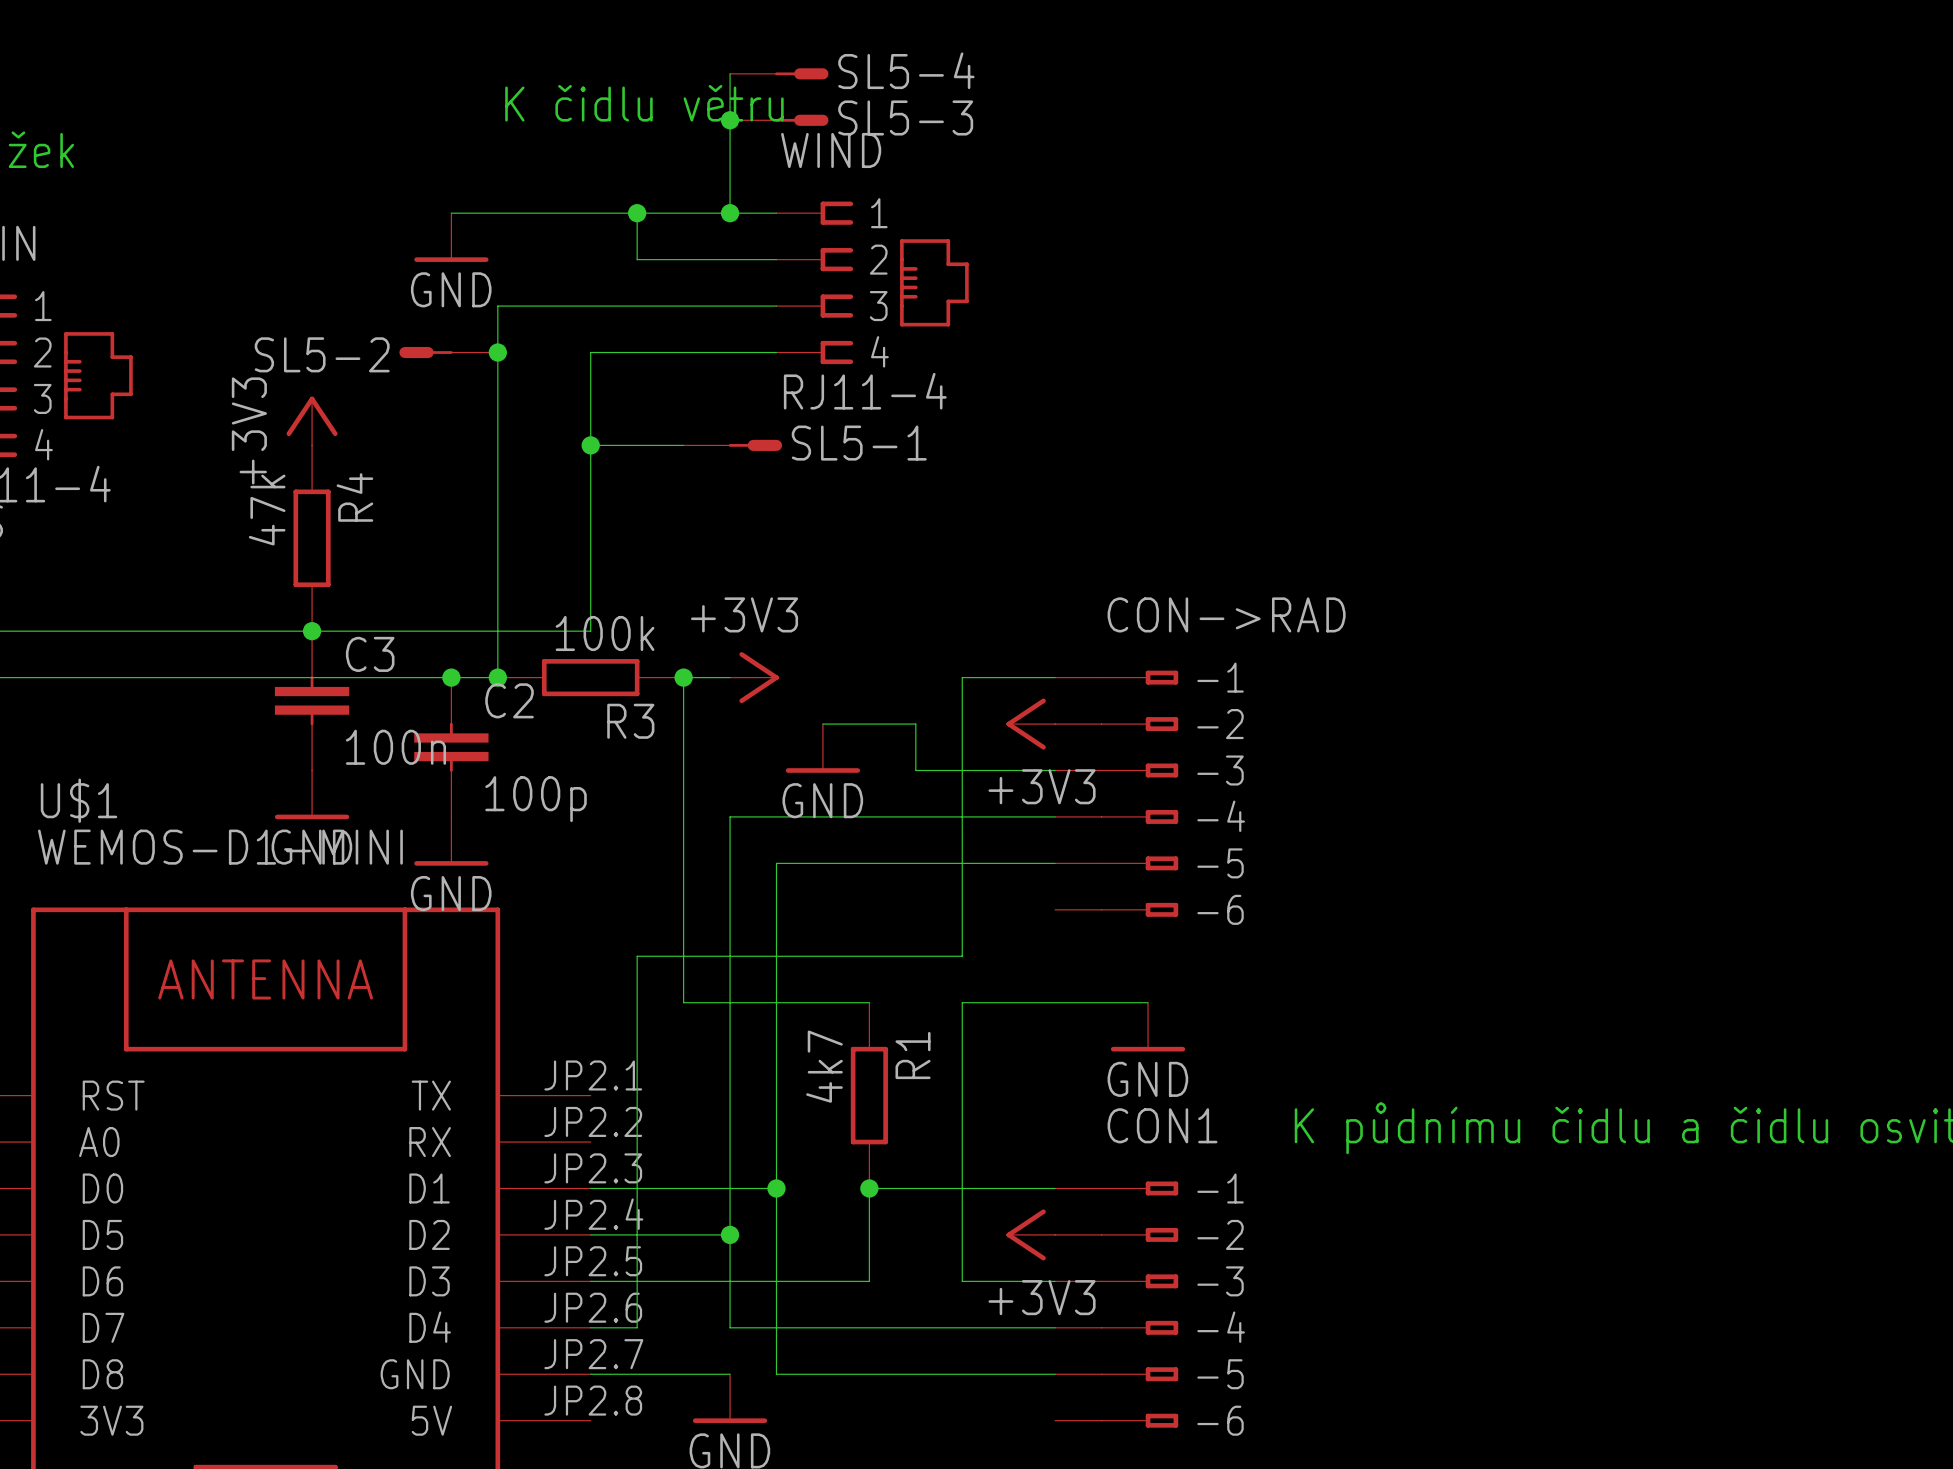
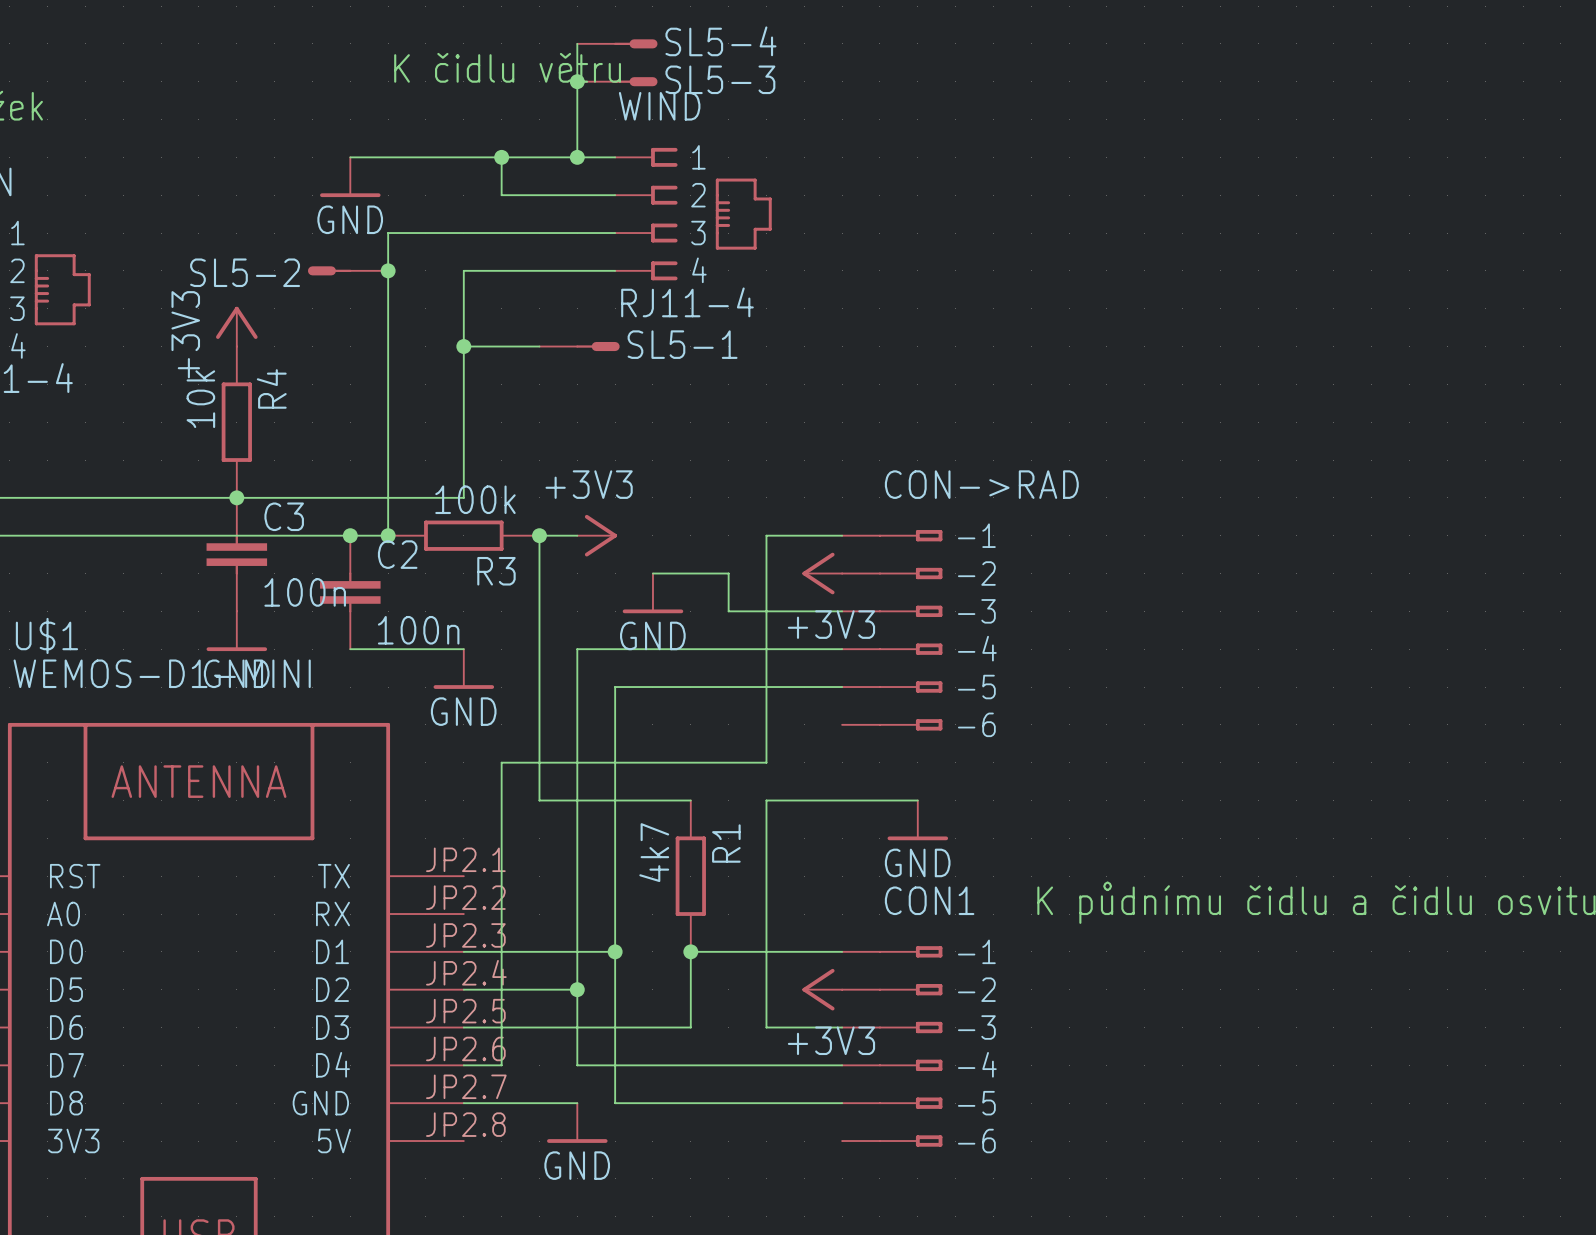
R4 value: 47k (267, 510) -> 10k (200, 399)
C2 value: 100p (536, 799) -> 100n (418, 630)
wire: none -> (350, 649) (463, 649)
power symbol position: GND (451, 841) -> GND (463, 669)

